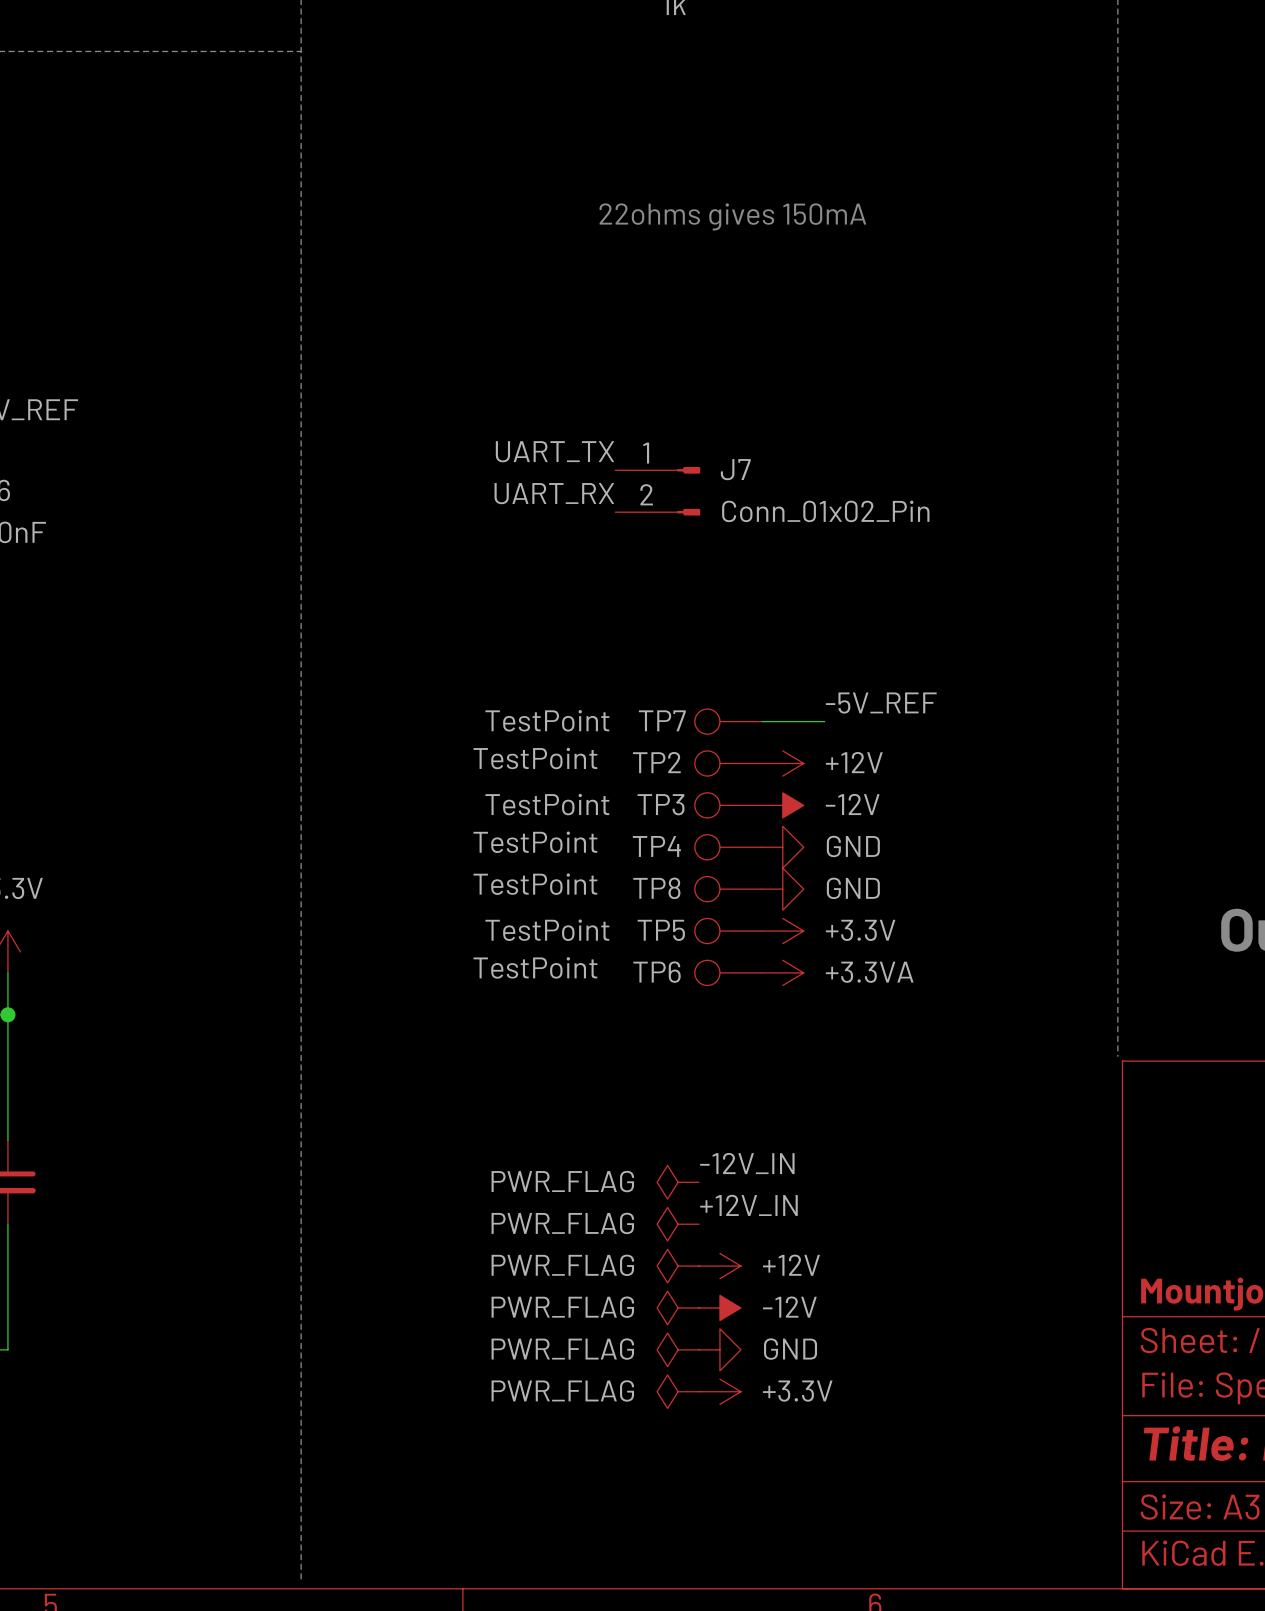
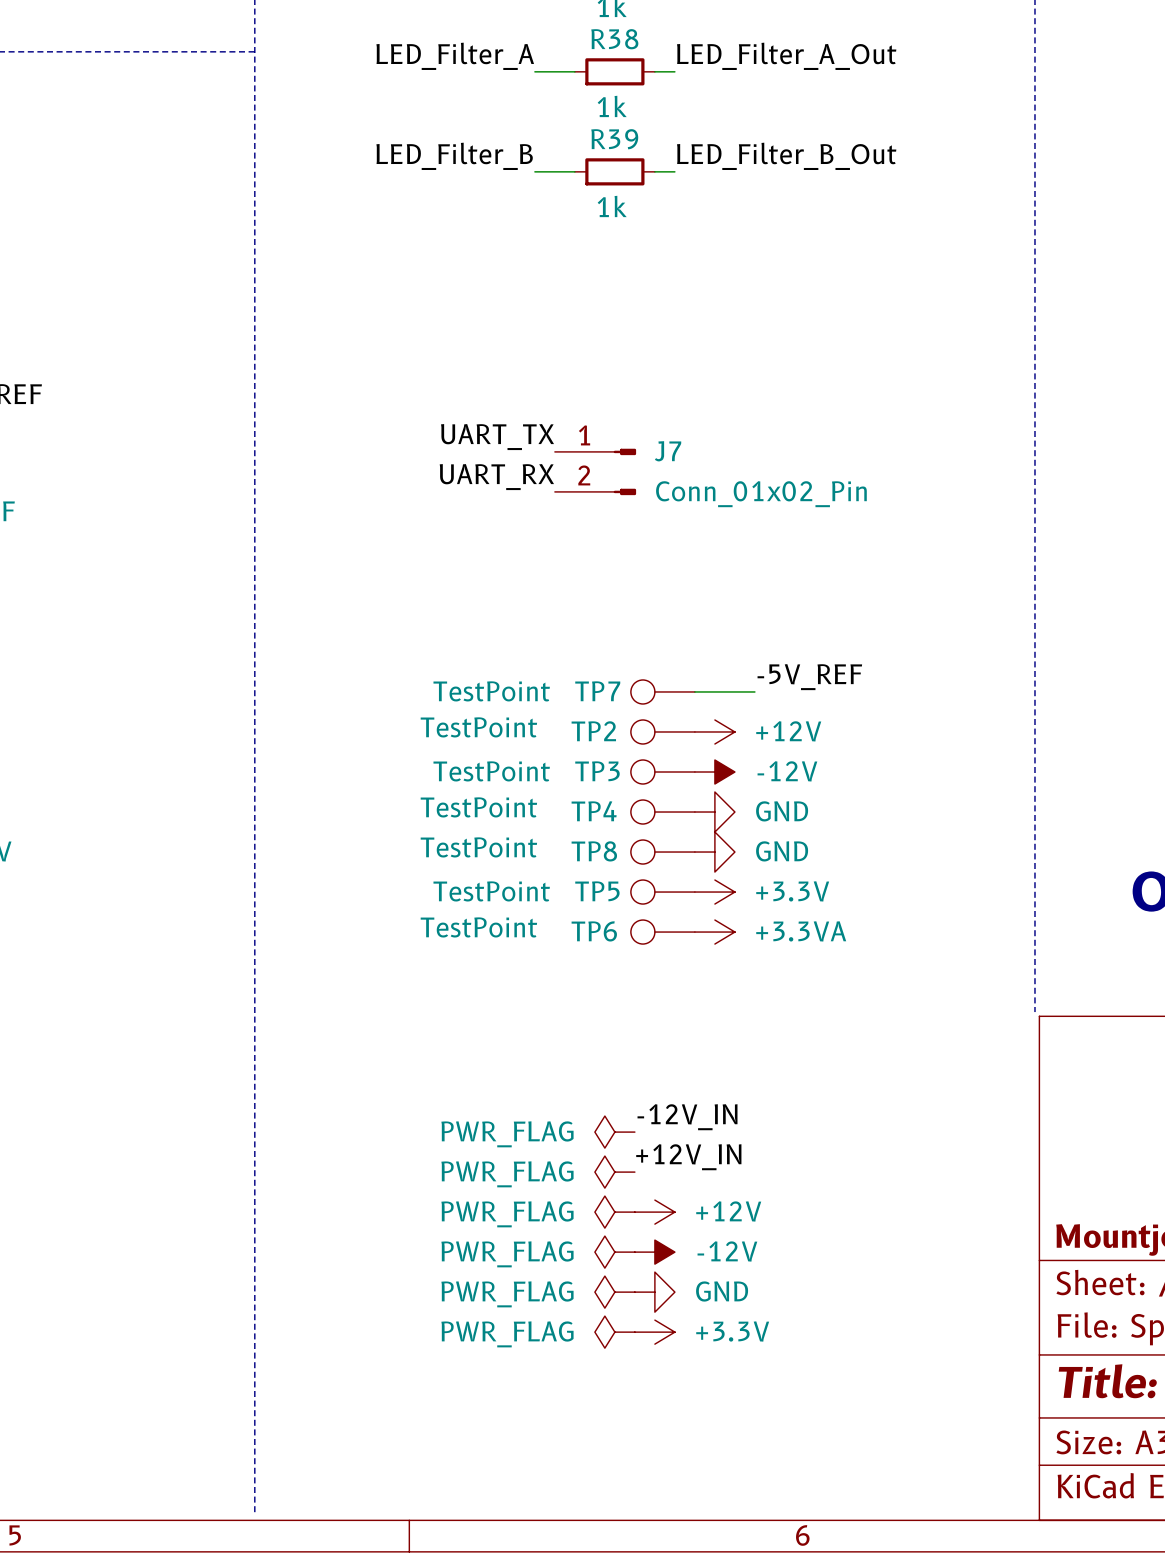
label: none -> LED_Filter_A (455, 56)
label: none -> LED_Filter_A_Out (786, 56)
wire: none -> (534, 71) (574, 71)
R38: none -> 1k (614, 71)
wire: none -> (654, 71) (674, 71)
label: none -> LED_Filter_B (454, 156)
label: none -> LED_Filter_B_Out (786, 156)
wire: none -> (534, 171) (574, 171)
R39: none -> 1k (614, 171)
wire: none -> (654, 171) (674, 171)
text: 22ohms gives 150mA (732, 216) -> none

